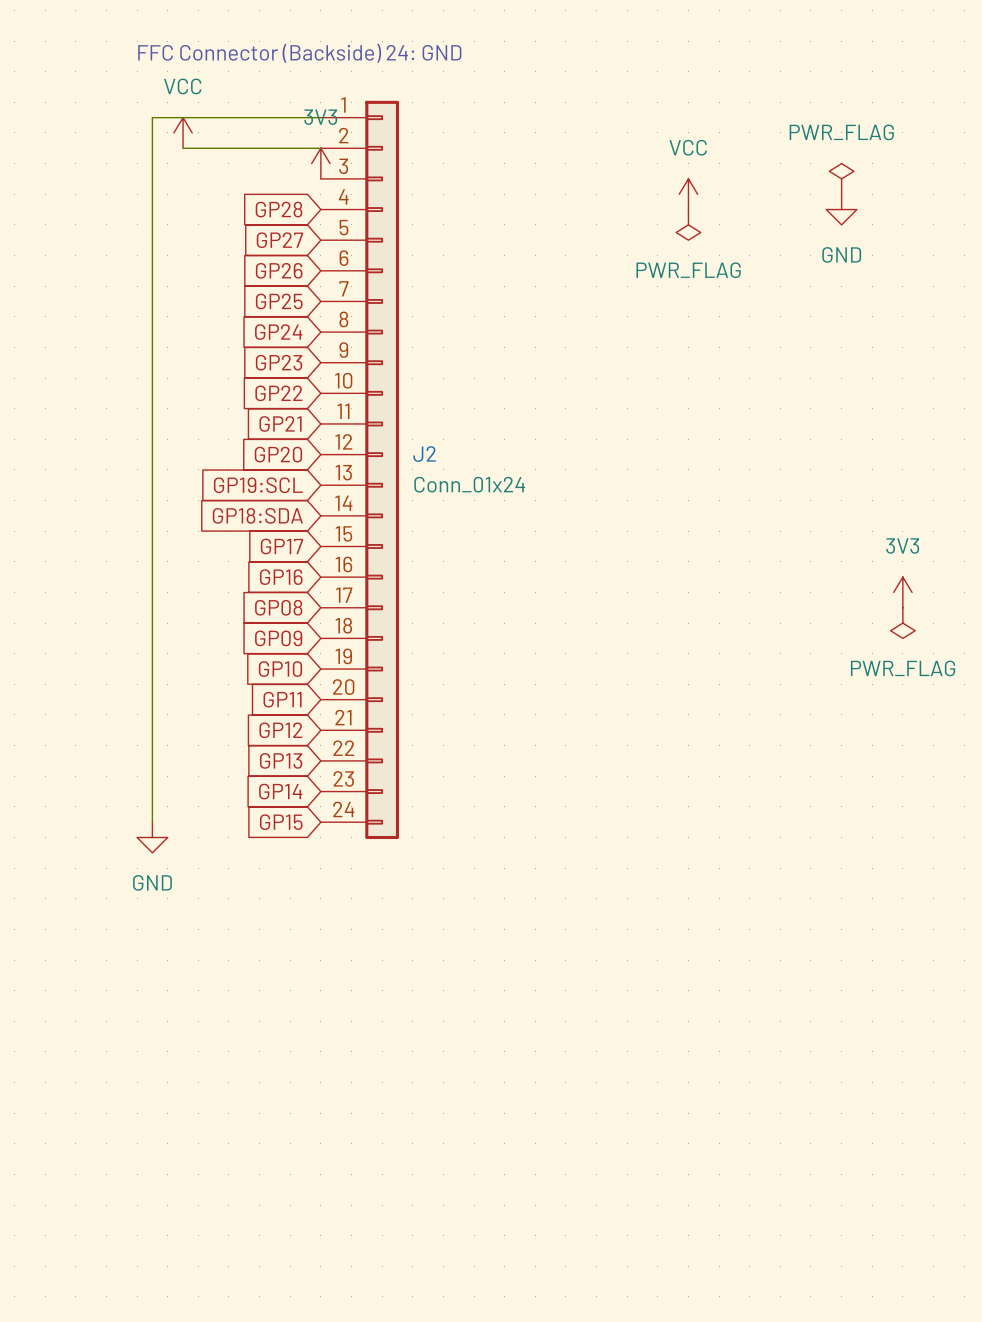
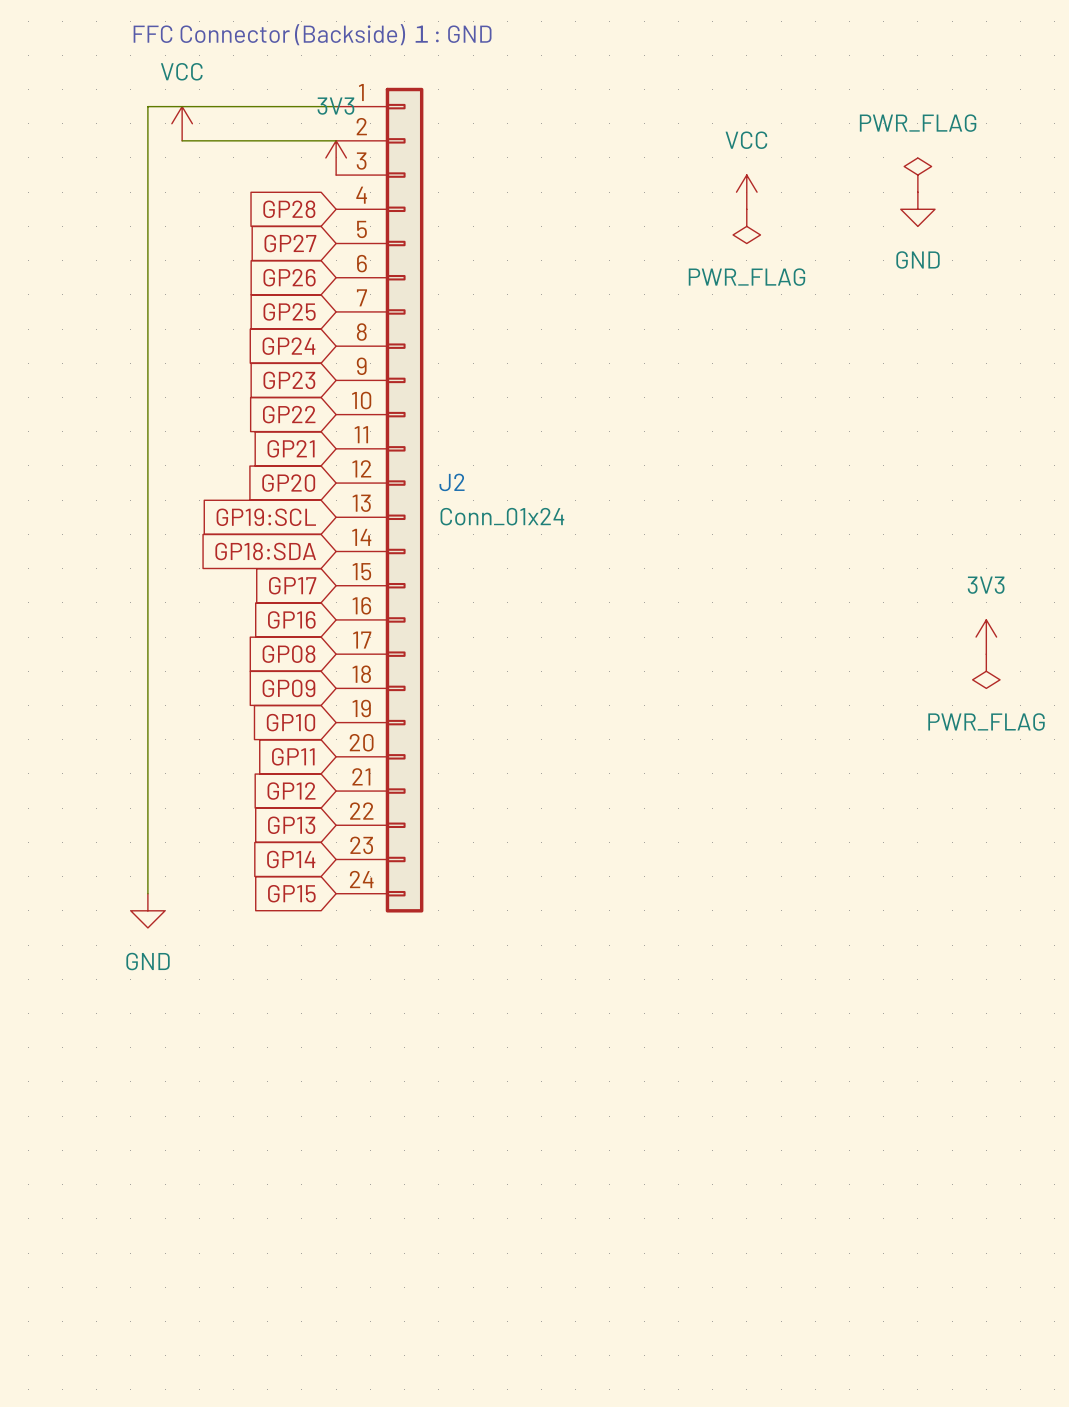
text: FFC Connector (Backside) 24: GND (299, 53) -> FFC Connector (Backside) １: GND (312, 34)

